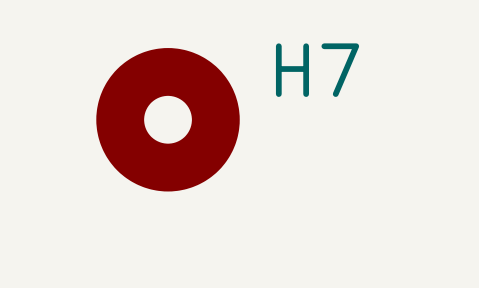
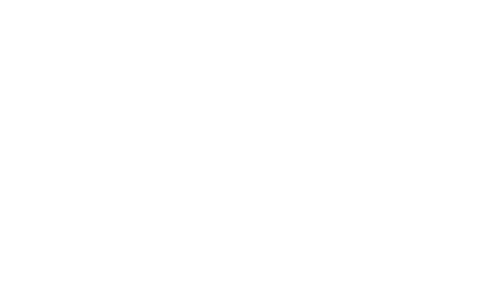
H7: (168, 119) -> none

